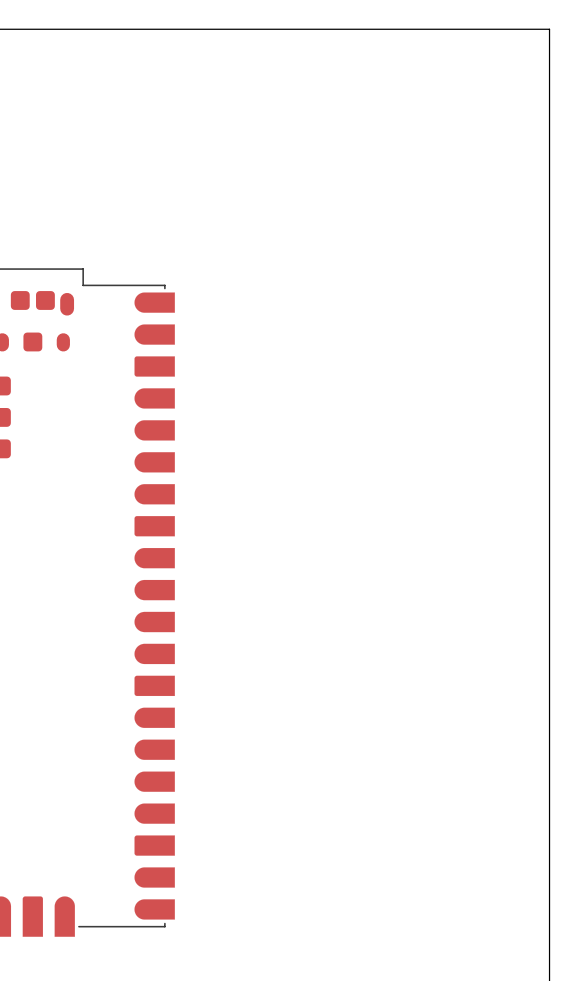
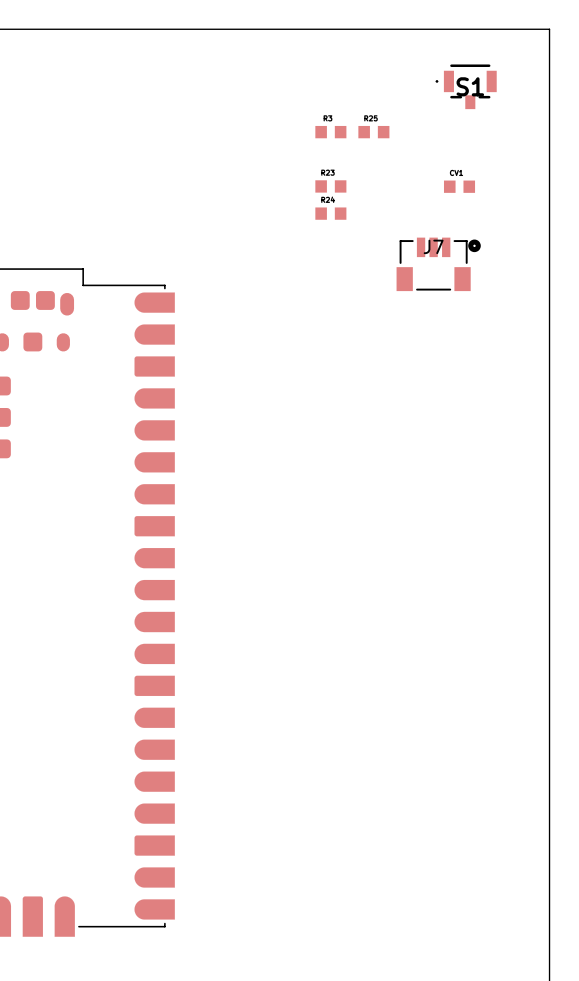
S1: none -> (466, 86)
part: none -> (330, 132)
part: none -> (373, 132)
part: none -> (330, 186)
part: none -> (459, 186)
part: none -> (330, 213)
J7: none -> (438, 264)

